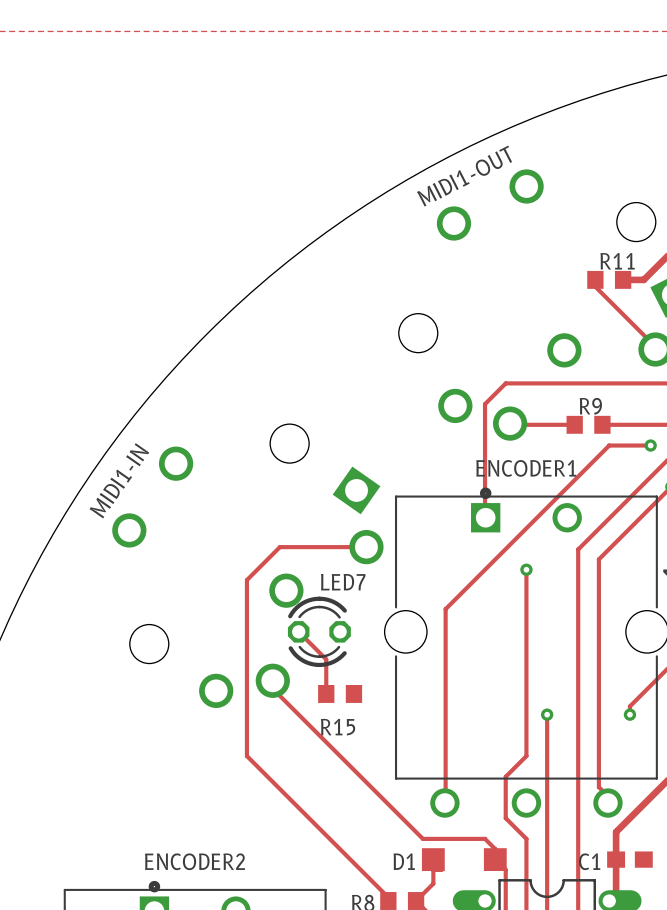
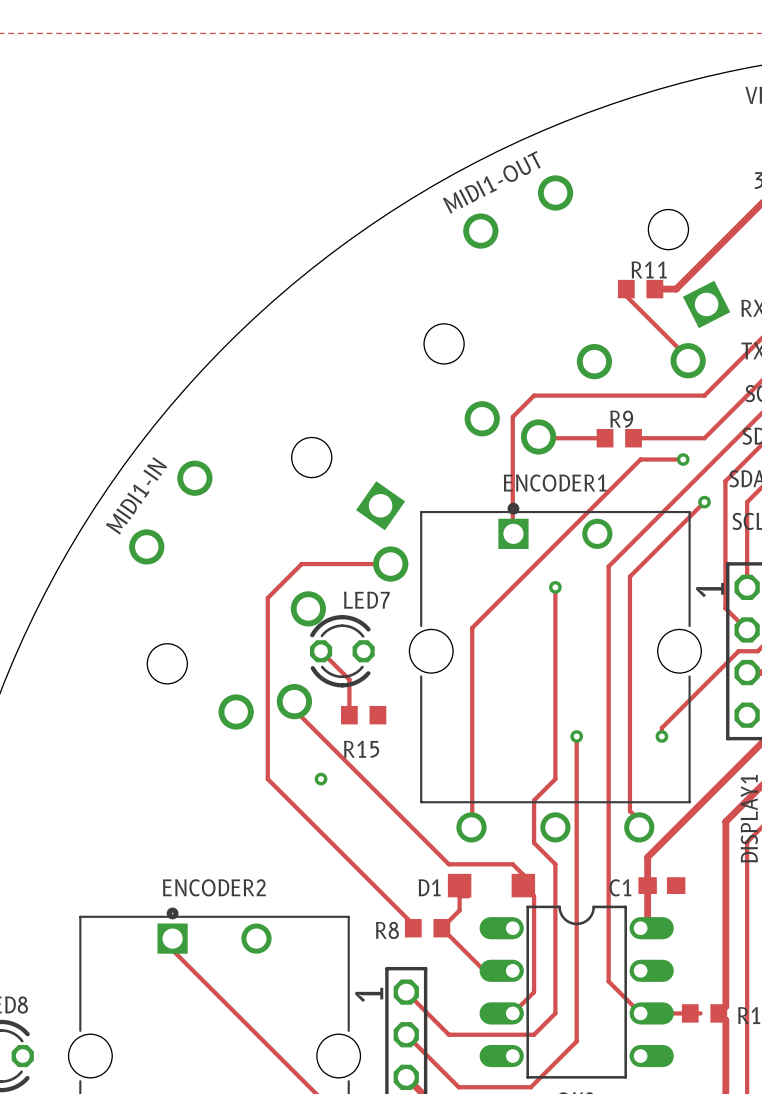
via: none -> (321, 779)

